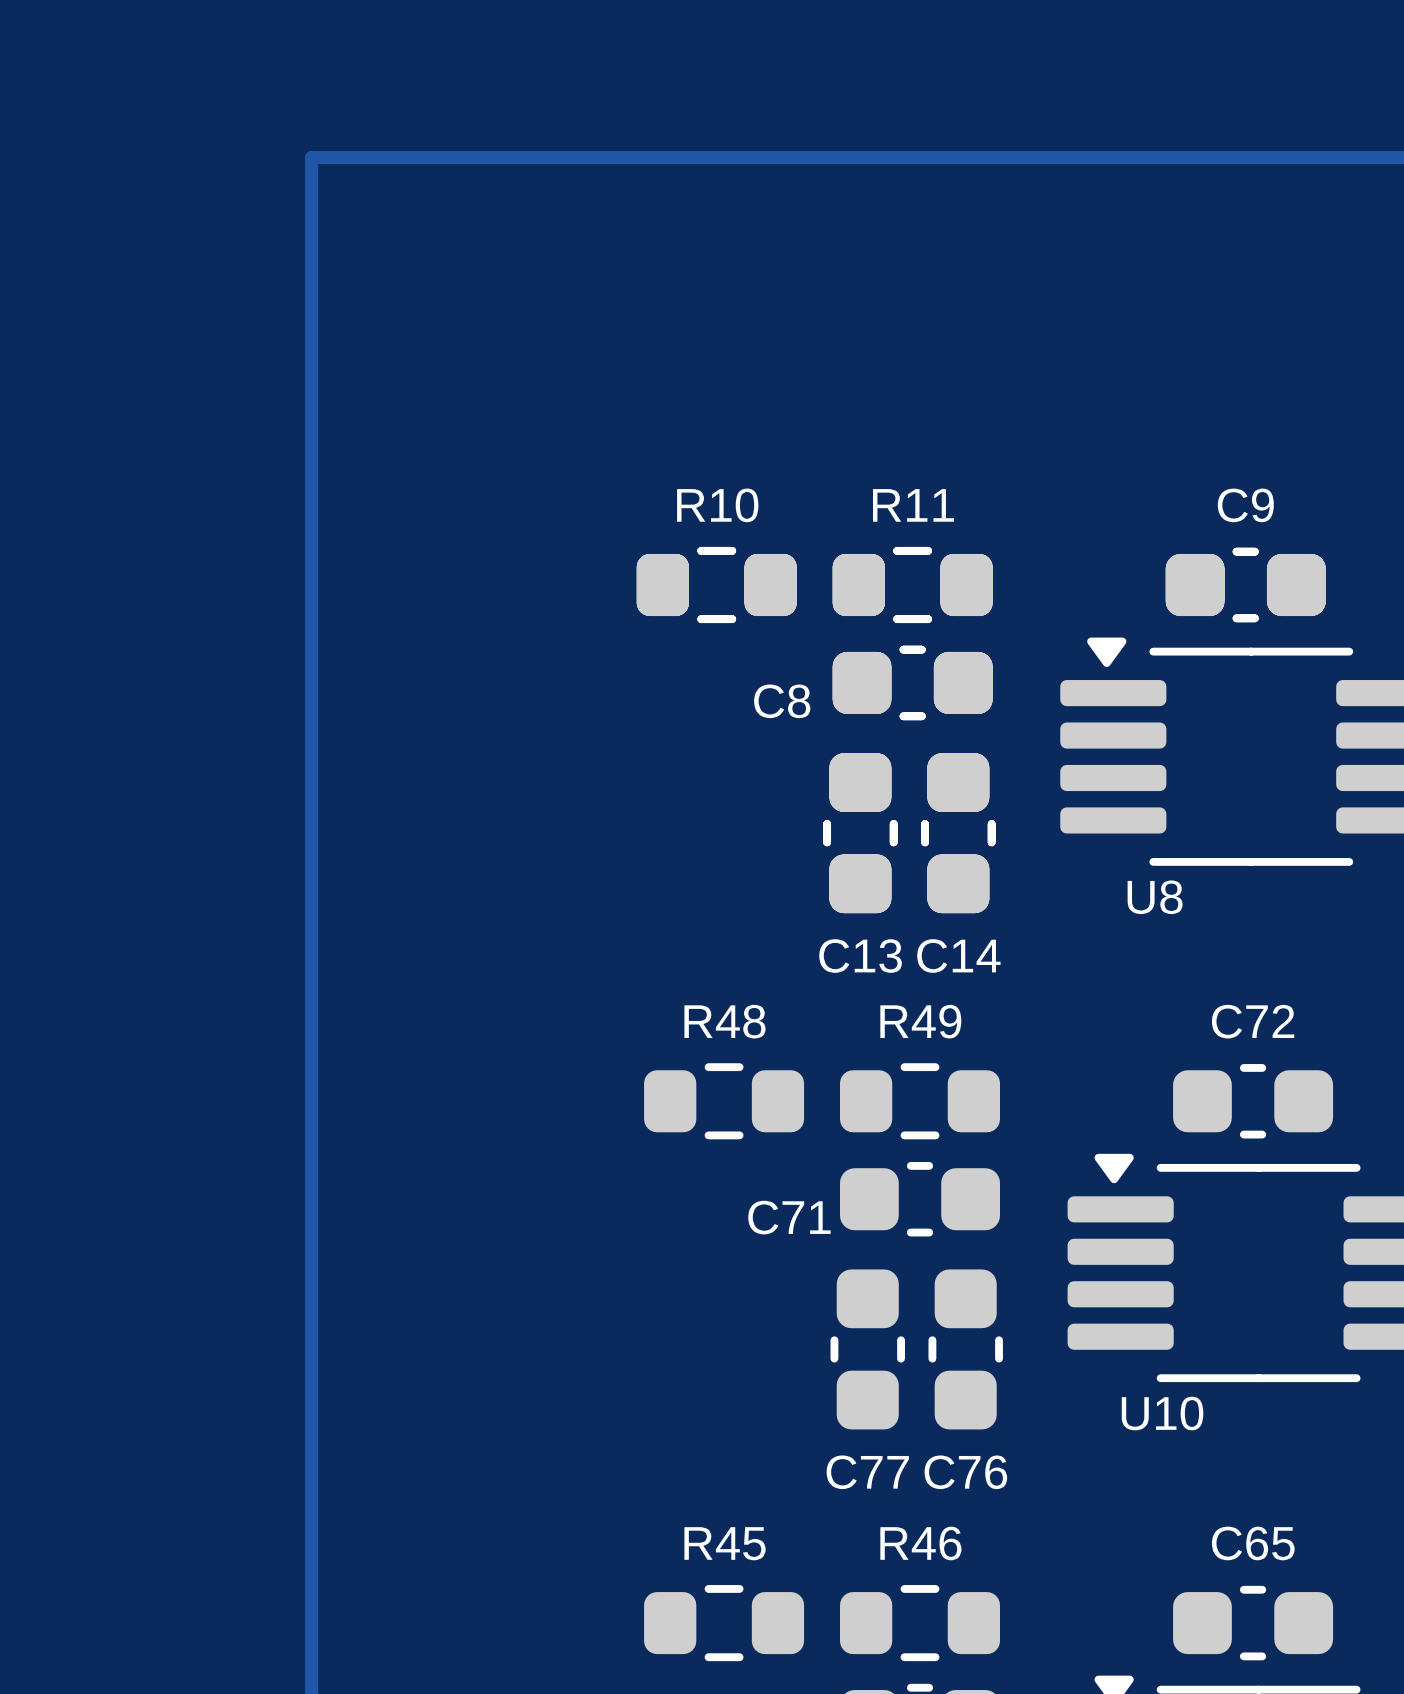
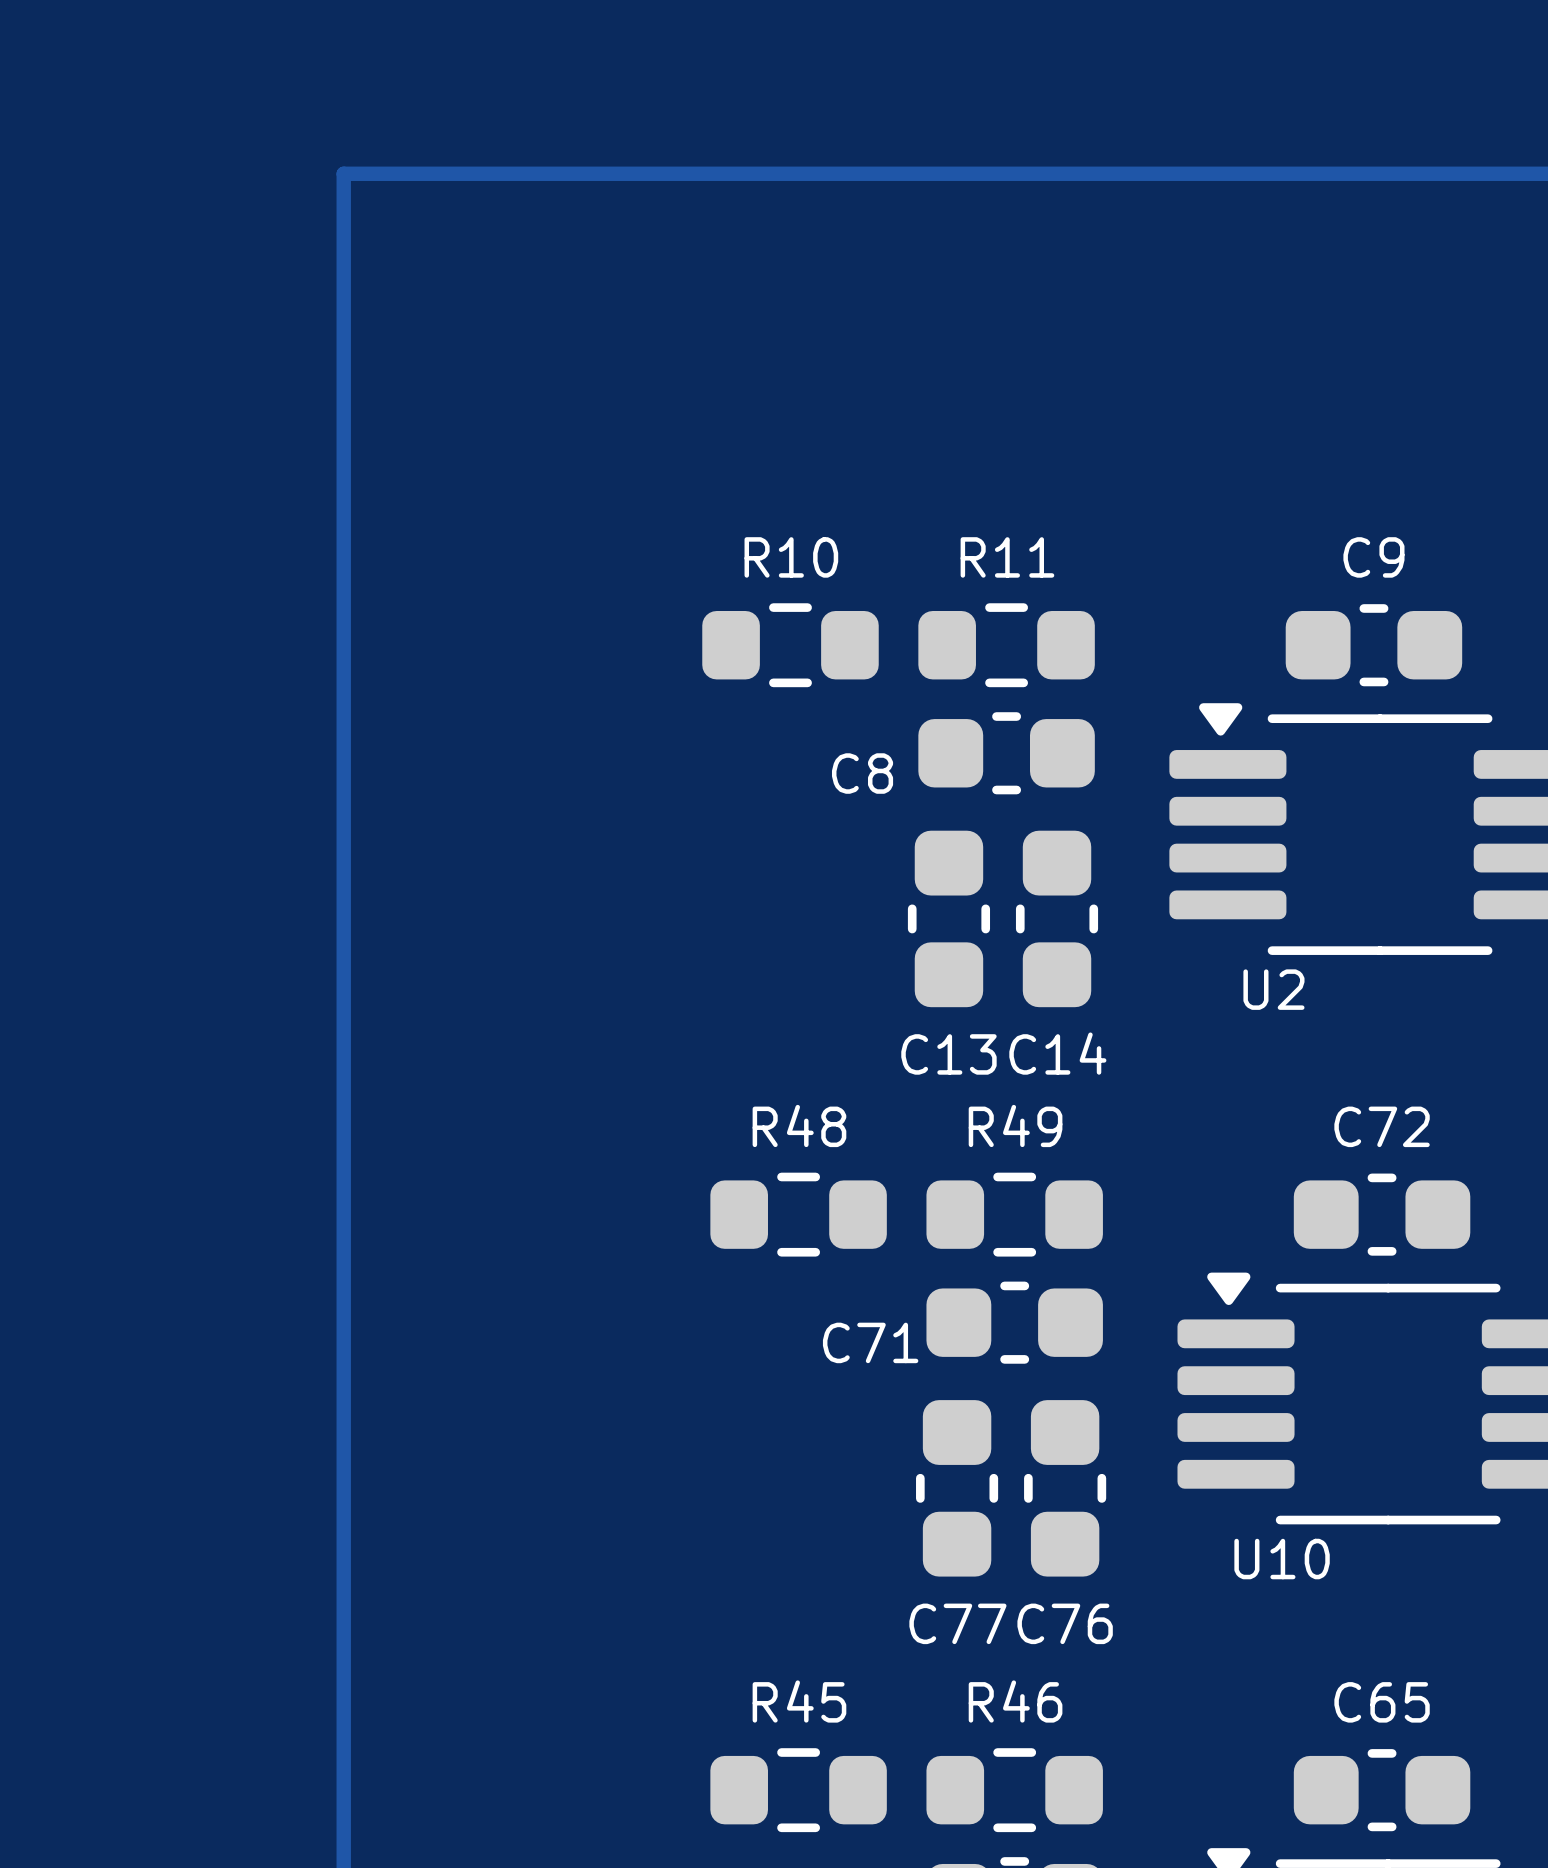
part: (716, 585) -> none
part: (912, 585) -> none
part: (1245, 585) -> none
part: (912, 682) -> none
part: (860, 833) -> none
part: (958, 833) -> none
U8 name: U8 (1155, 897) -> U2 (1273, 989)

